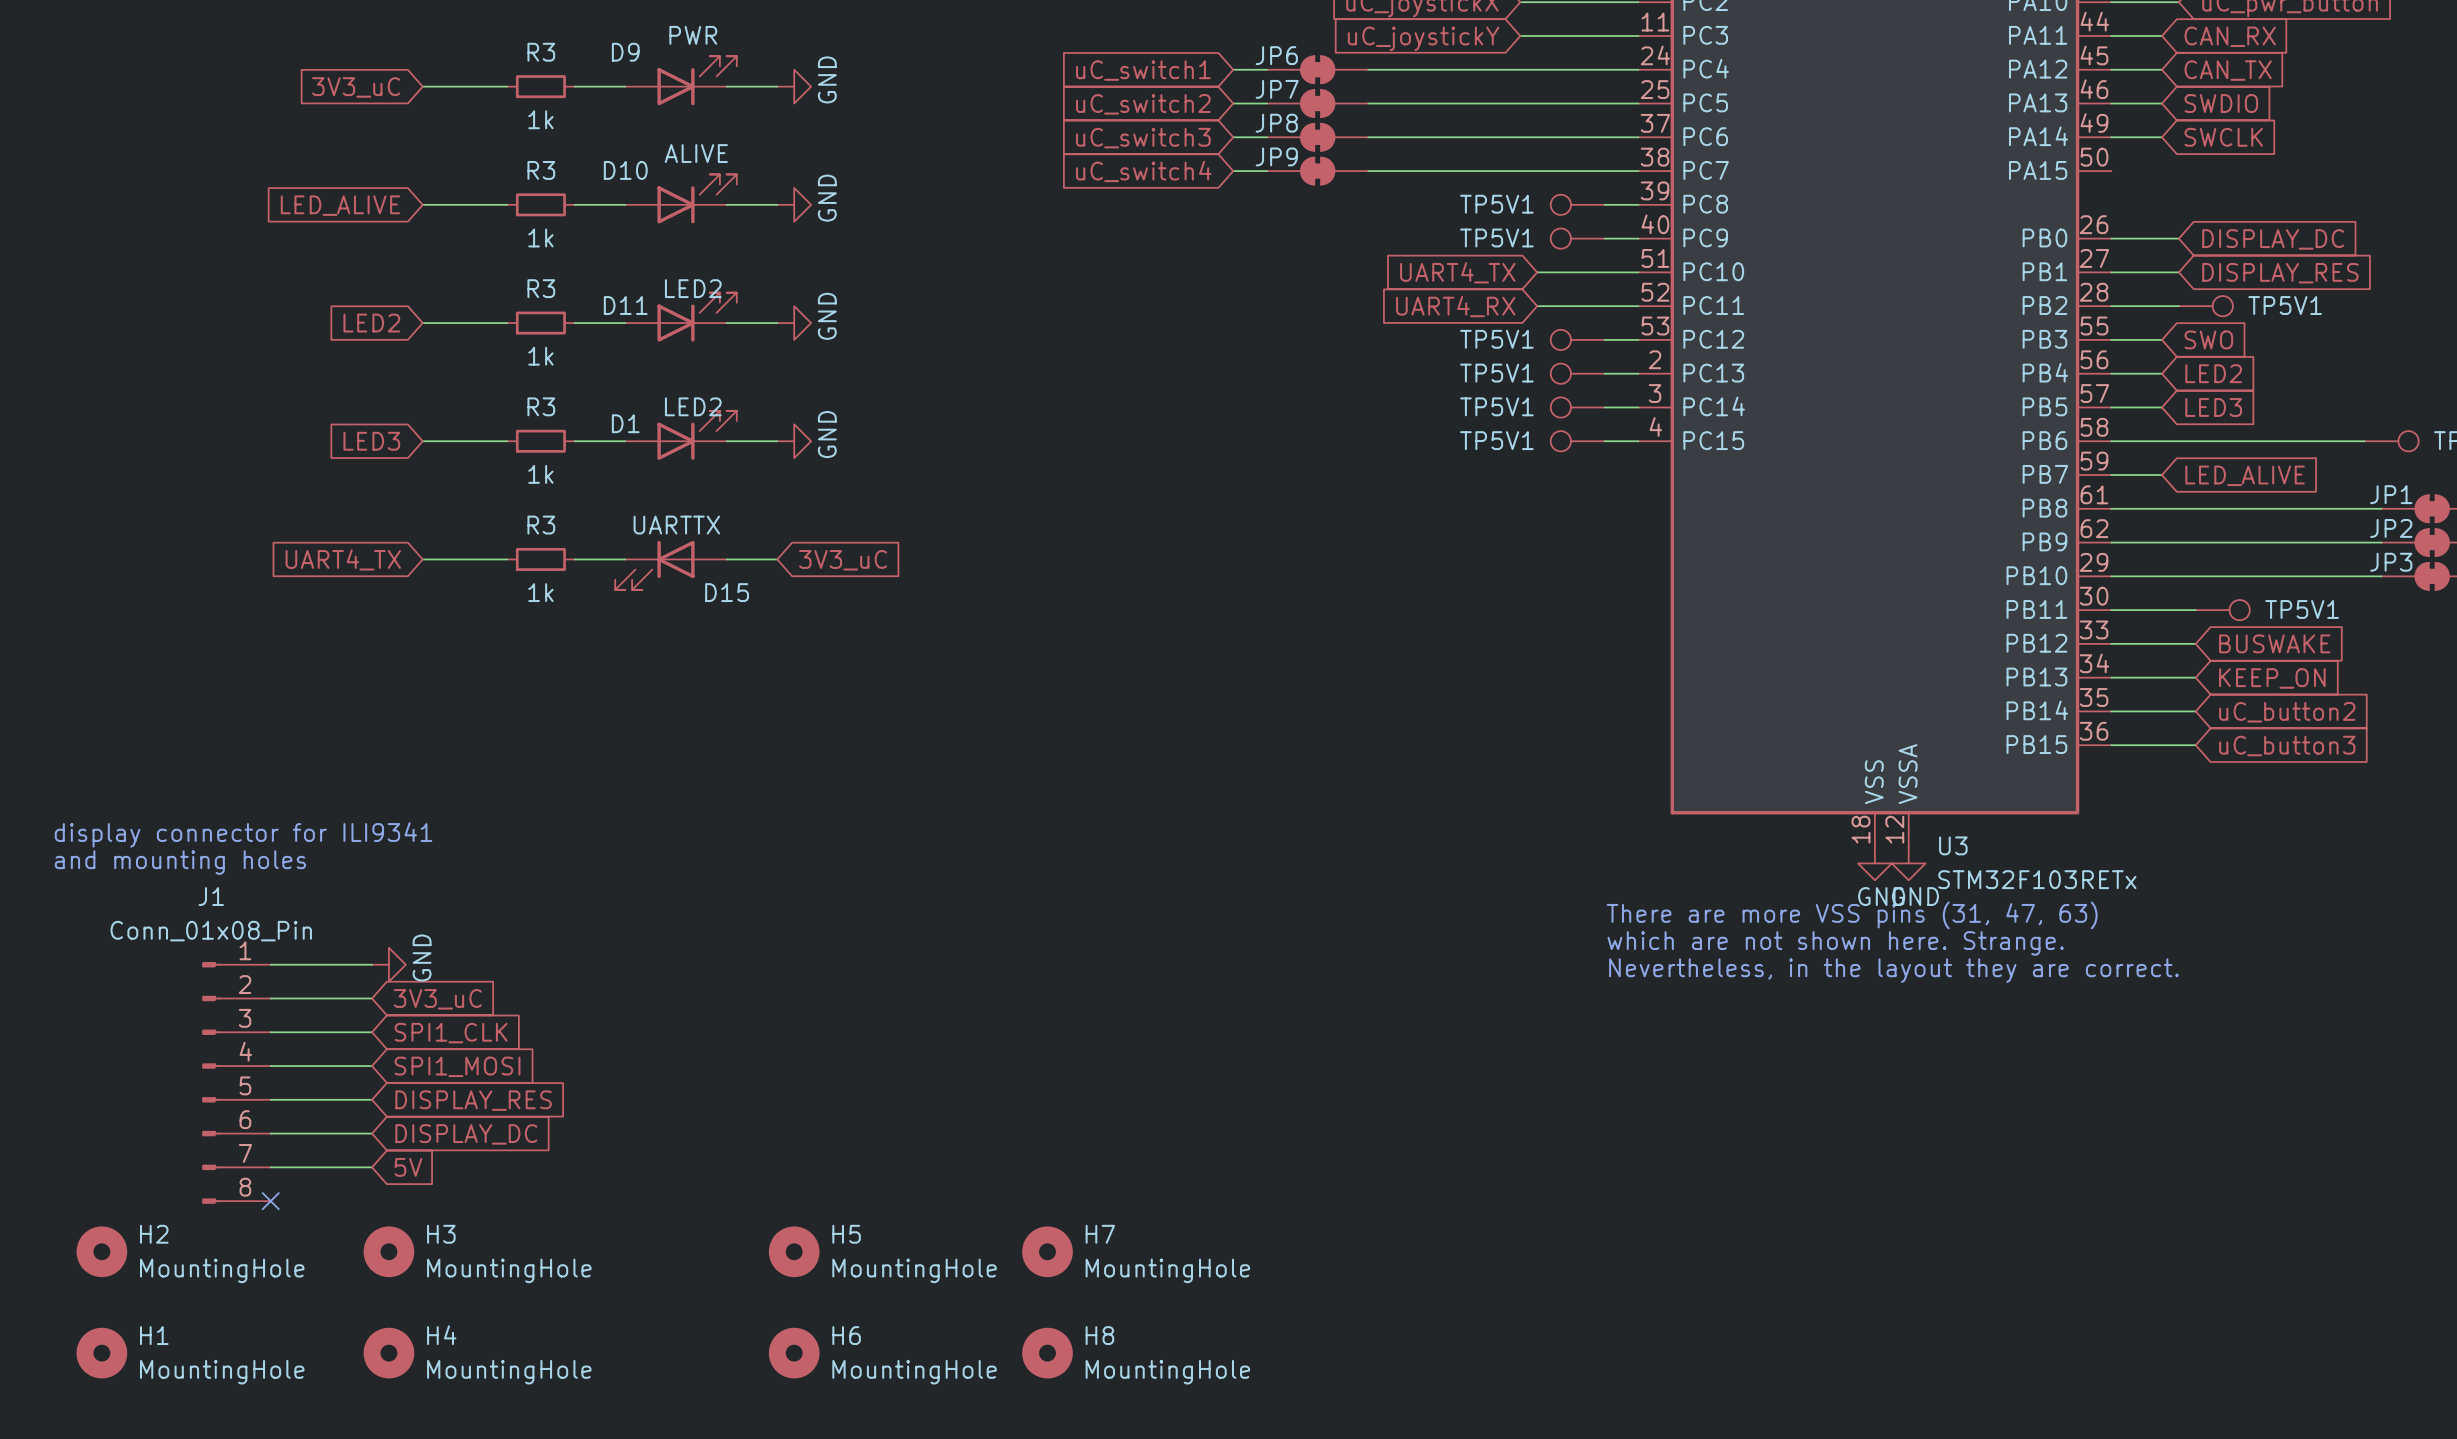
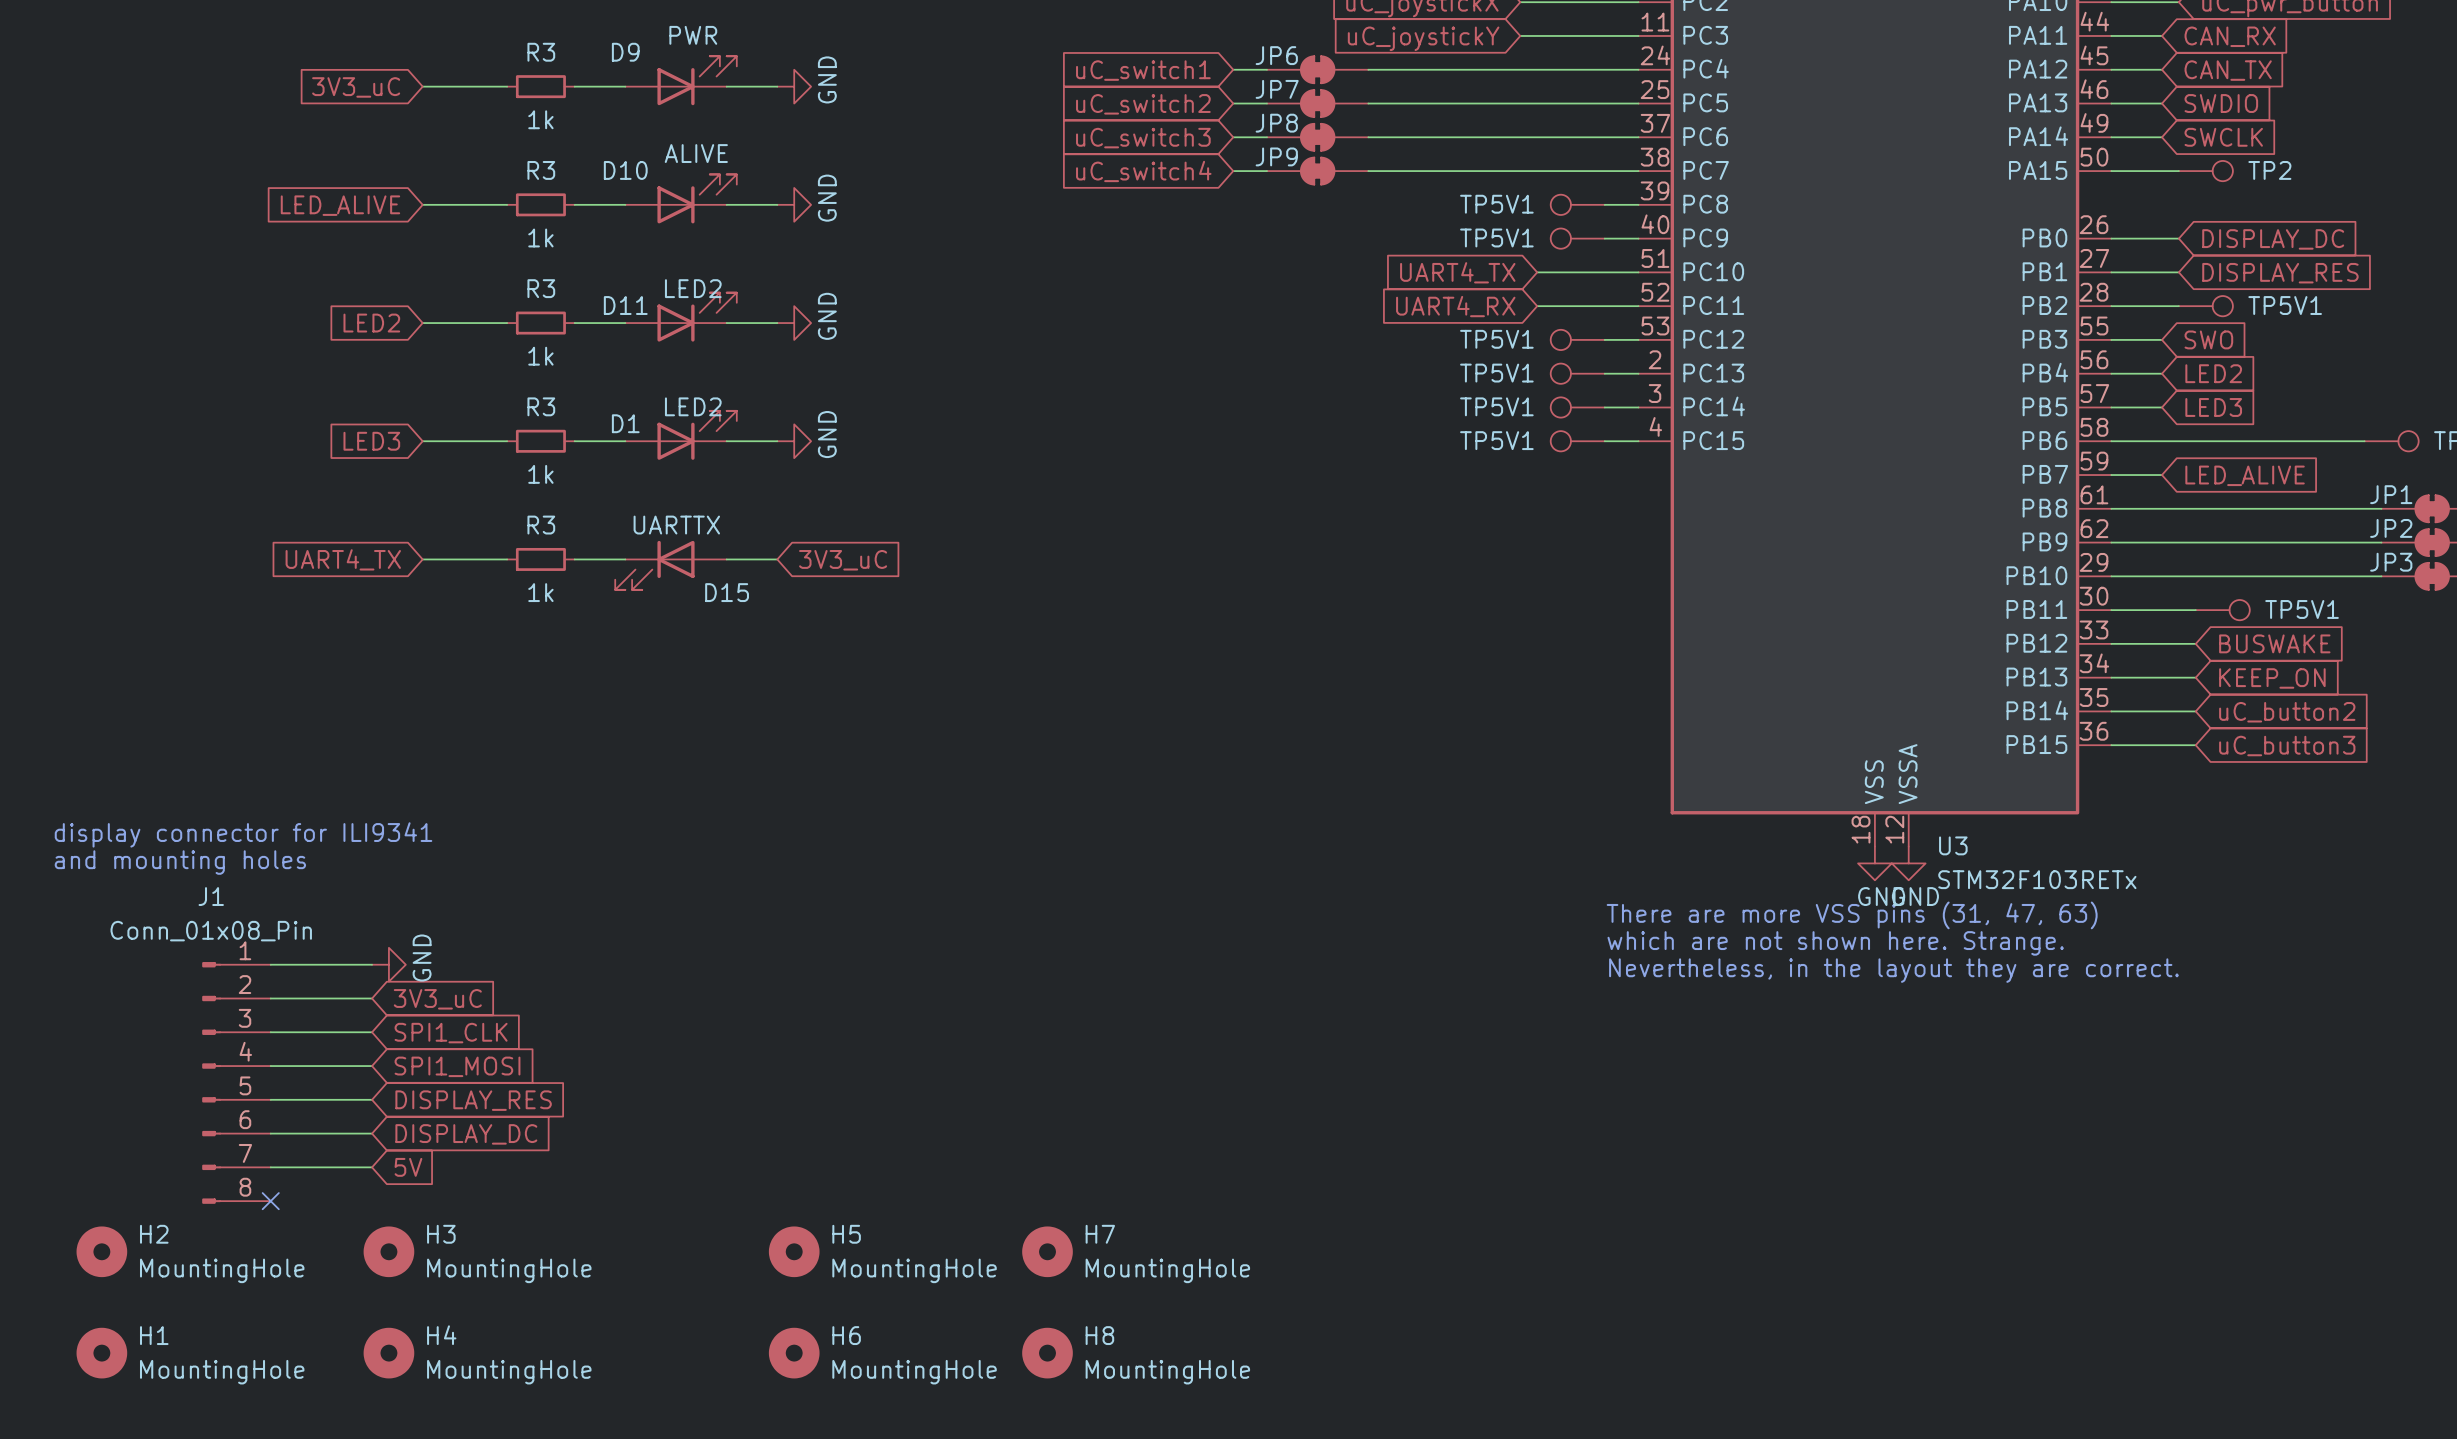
wire: none -> (2111, 171) (2178, 171)
TP2: none -> (2205, 171)

